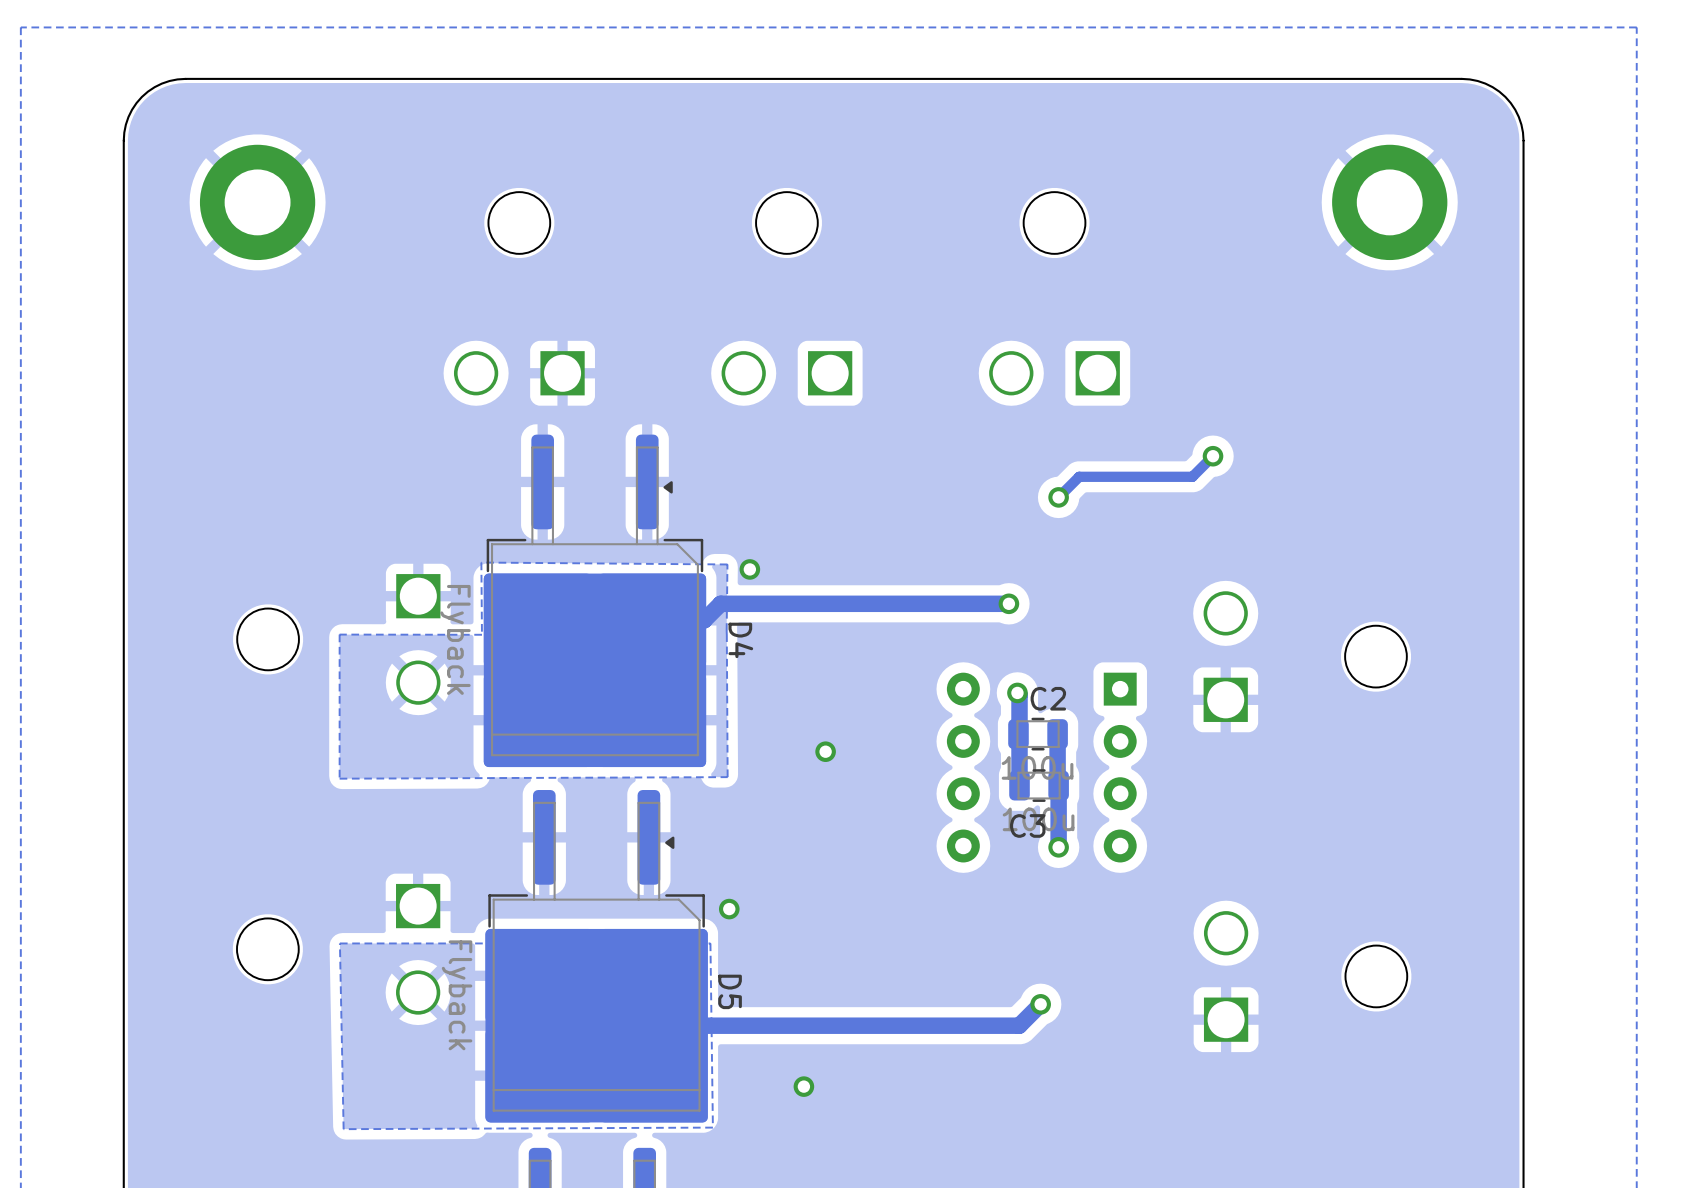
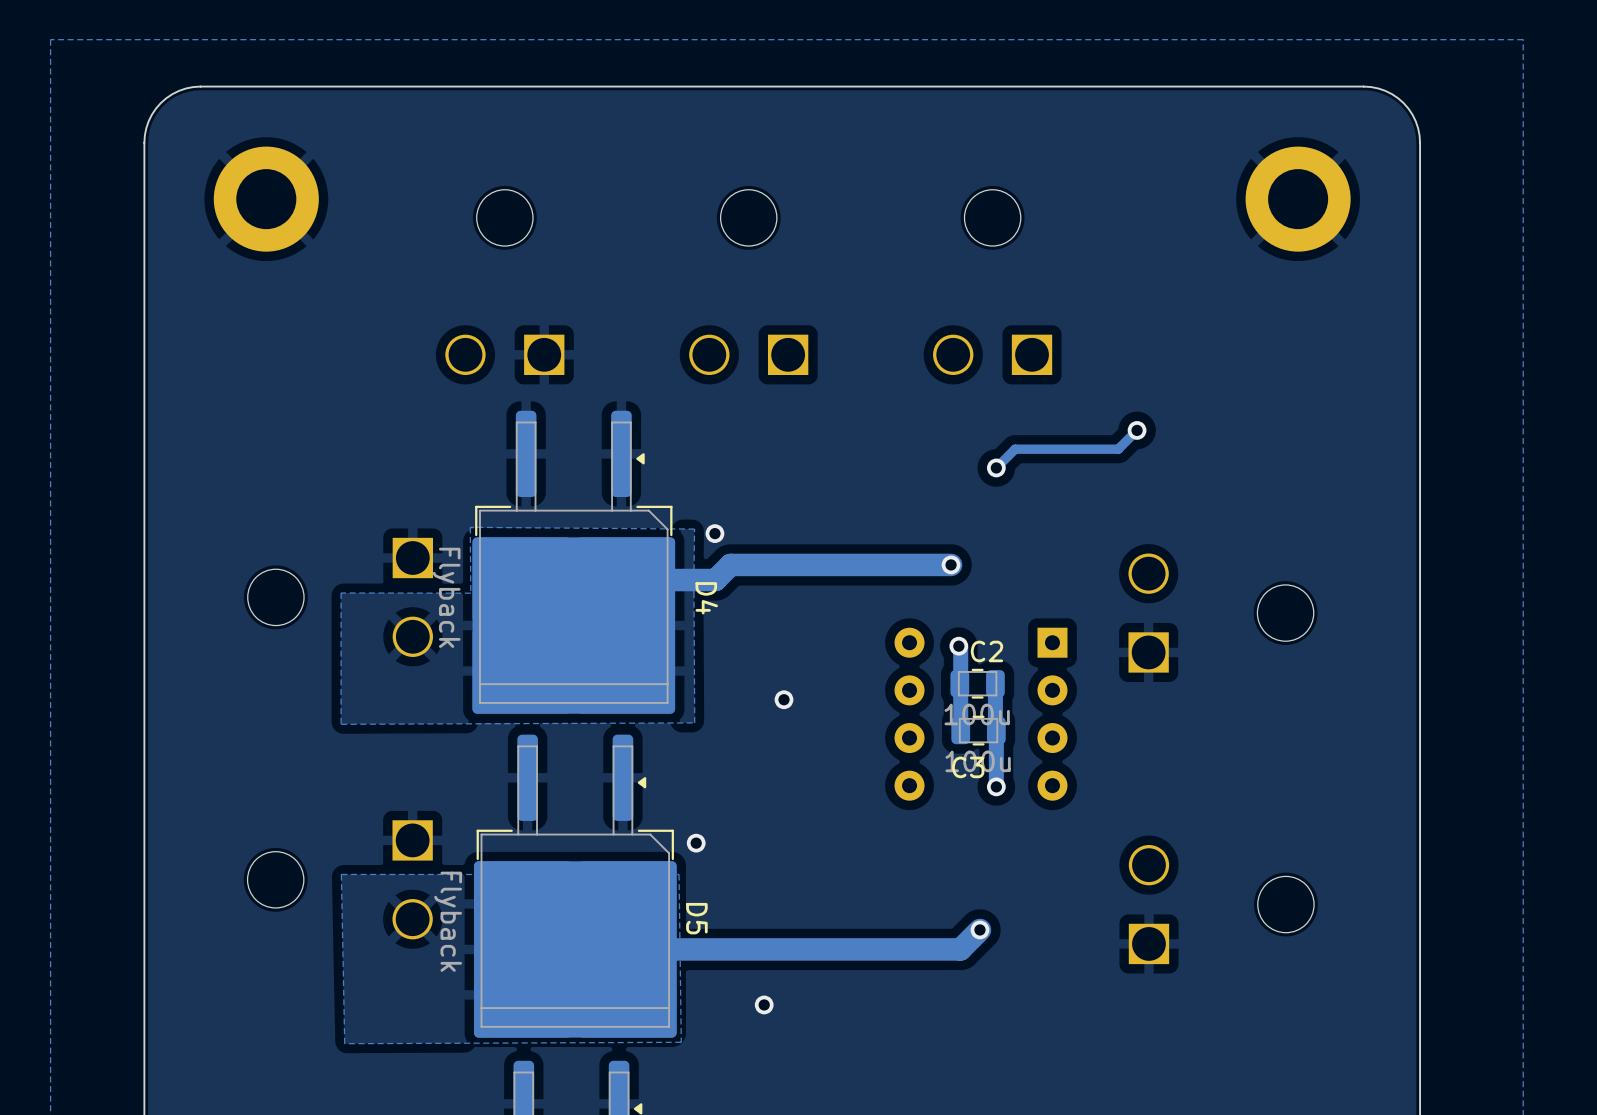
track: (766, 603) (720, 603) (704, 620) -> (730, 564) (715, 580) (673, 580)
track width: thin (1008, 603) (766, 603) -> thick (951, 564) (730, 564)
track width: thin (1040, 1004) (1019, 1025) (596, 1025) -> thick (979, 929) (960, 949) (575, 949)

